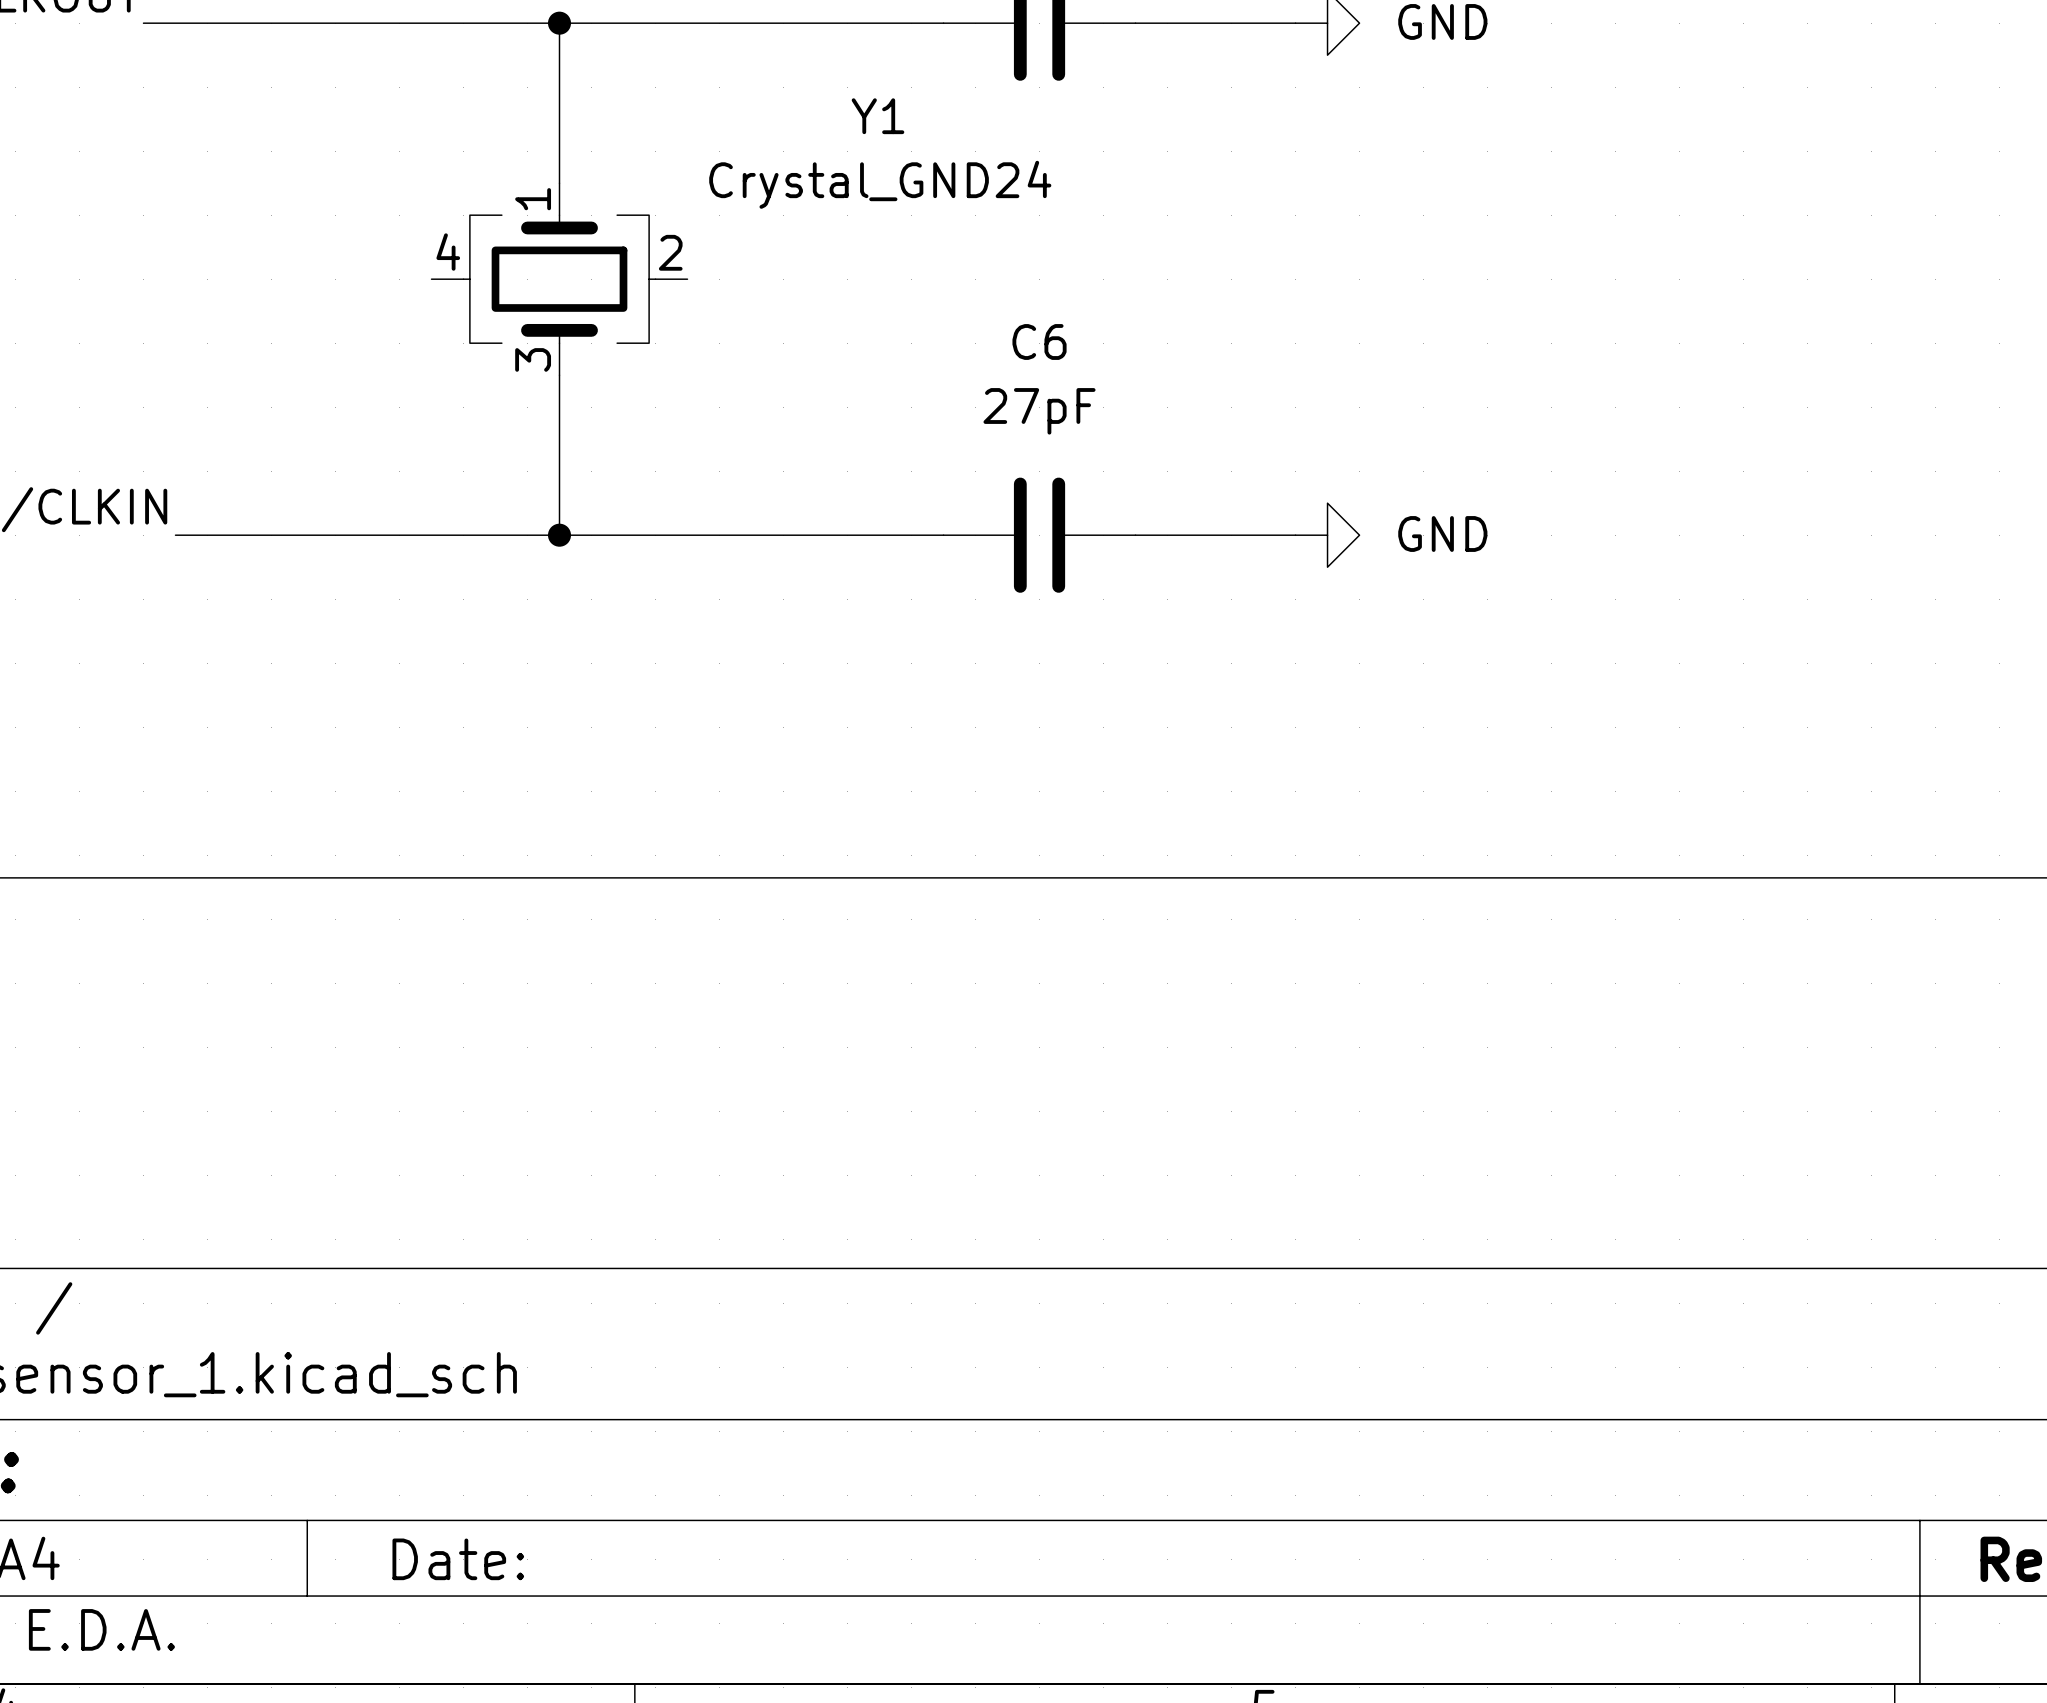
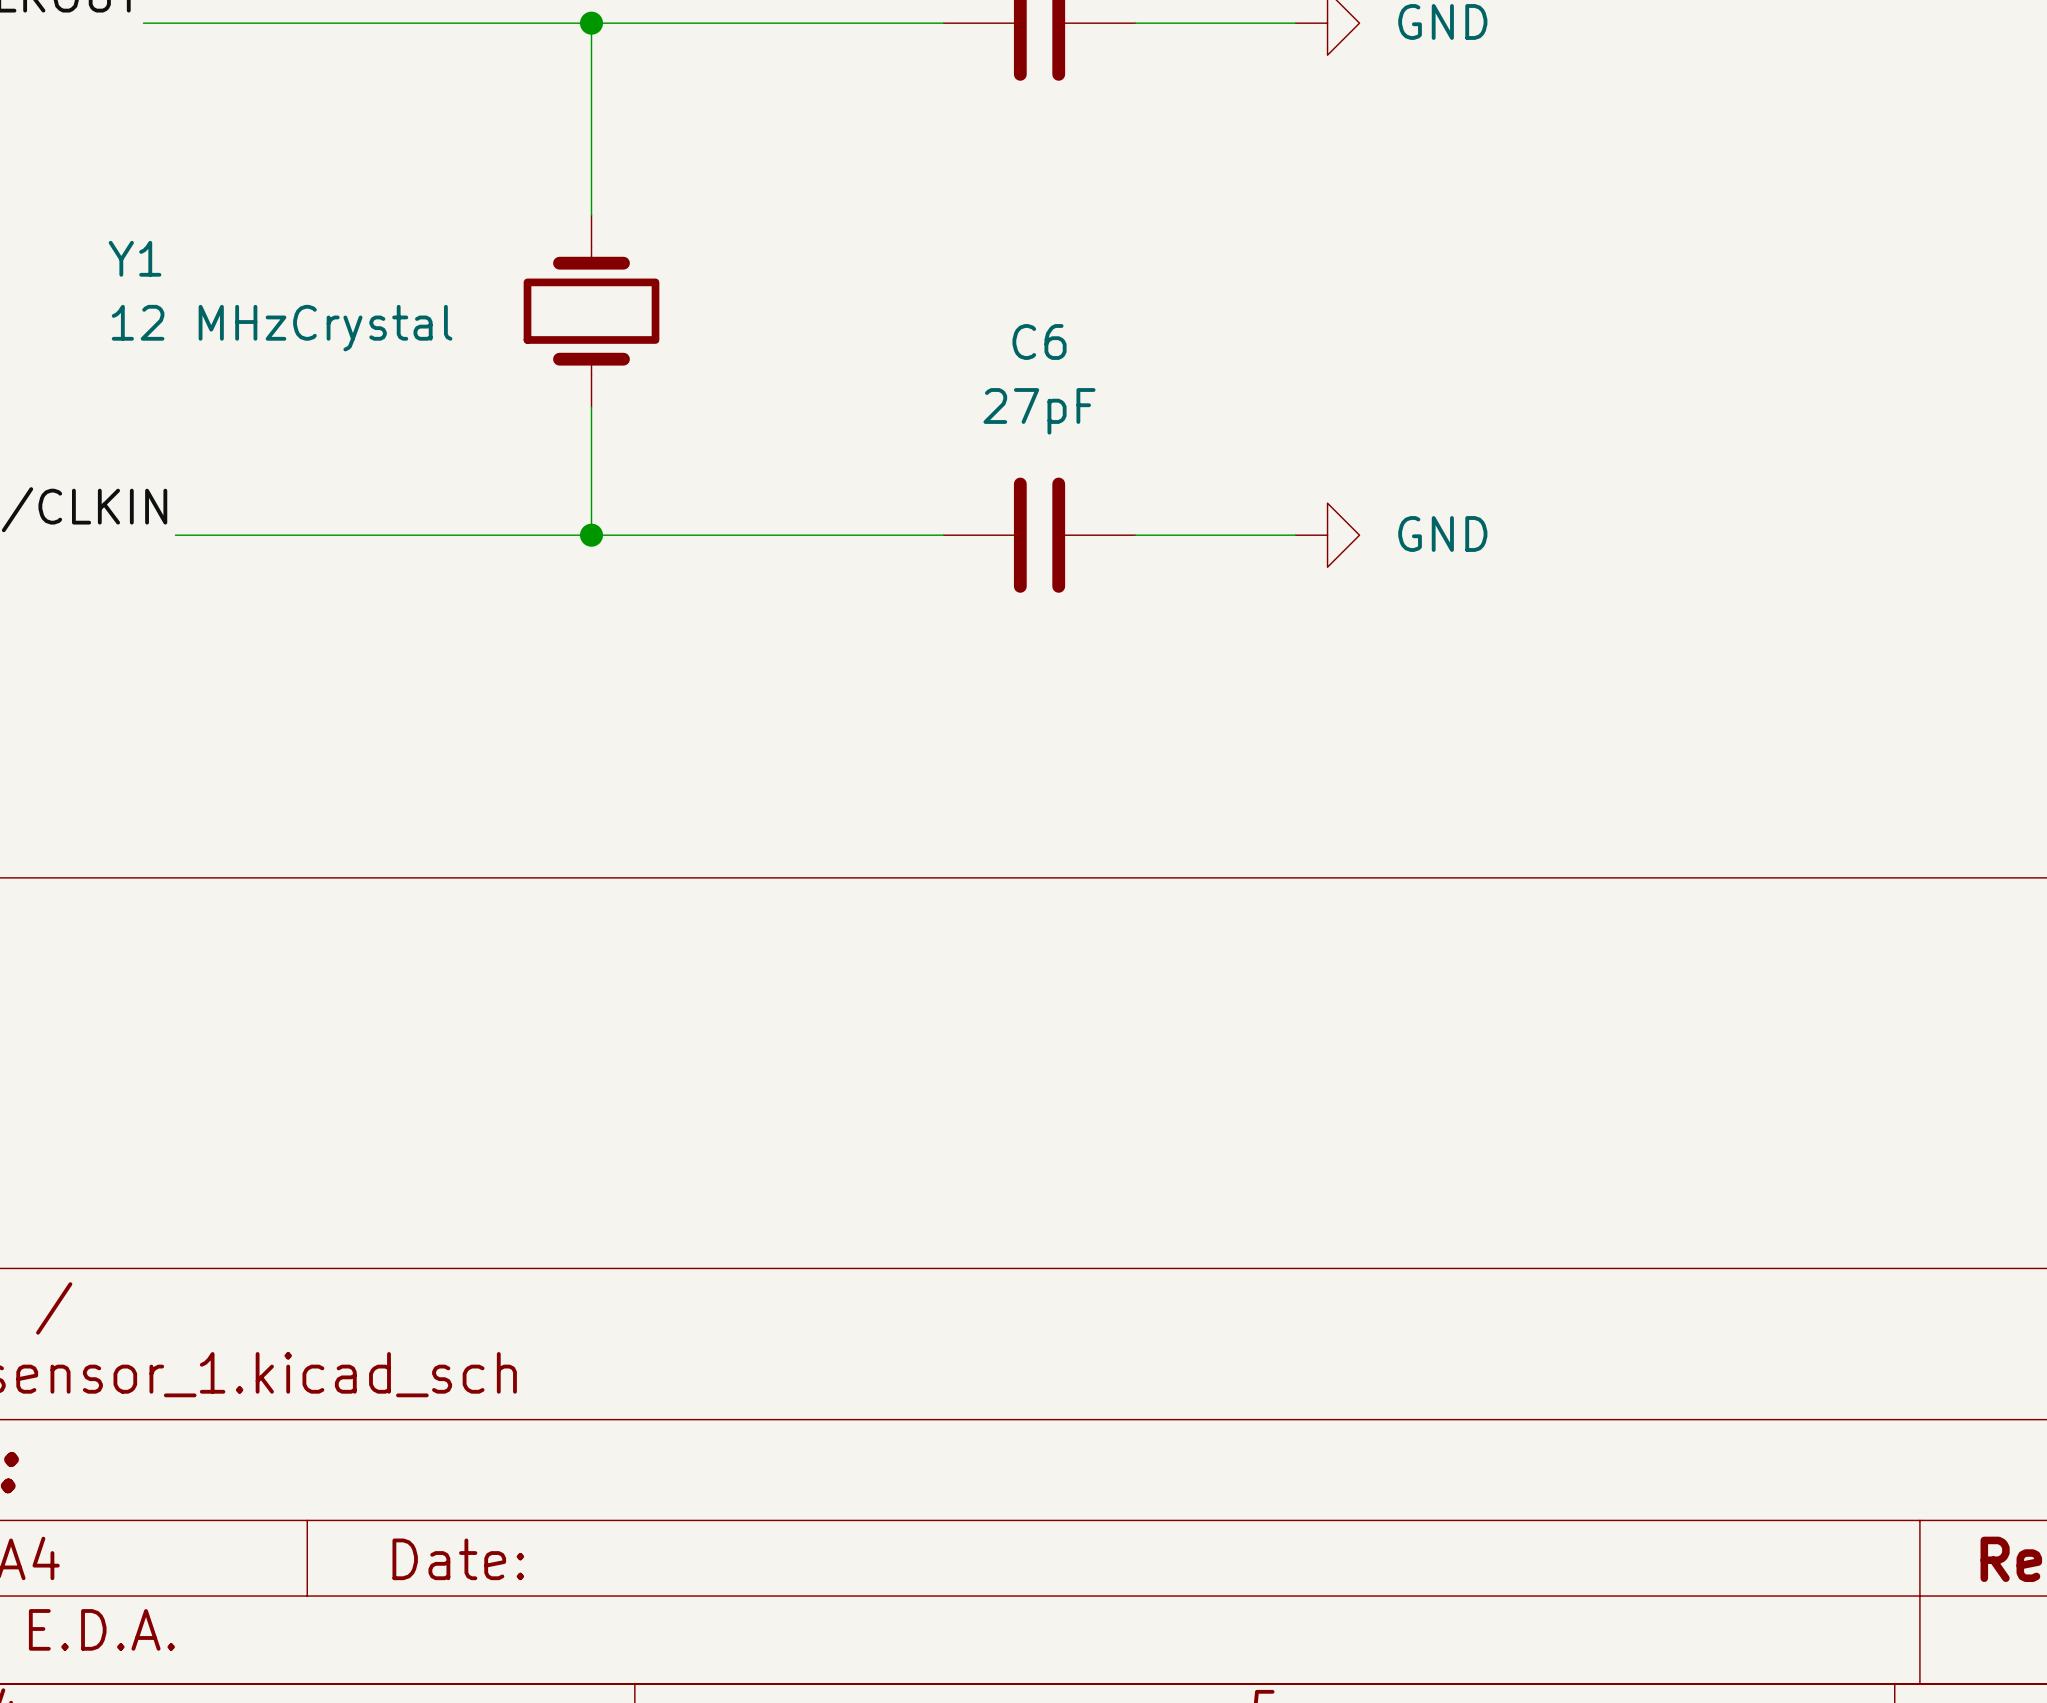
wire: (559, 23) (559, 183) -> none
junction position: (559, 23) -> (591, 23)
wire: none -> (591, 23) (591, 215)
Y1 name position: Y1 (877, 116) -> Y1 (135, 258)
Y1 symbol: [431, 183, 688, 376] -> [523, 215, 660, 408]
Y1 value: Crystal_GND24 (880, 184) -> 12 MHzCrystal (282, 328)
wire: (559, 375) (559, 535) -> none
wire: none -> (591, 407) (591, 535)
junction position: (559, 535) -> (591, 535)

